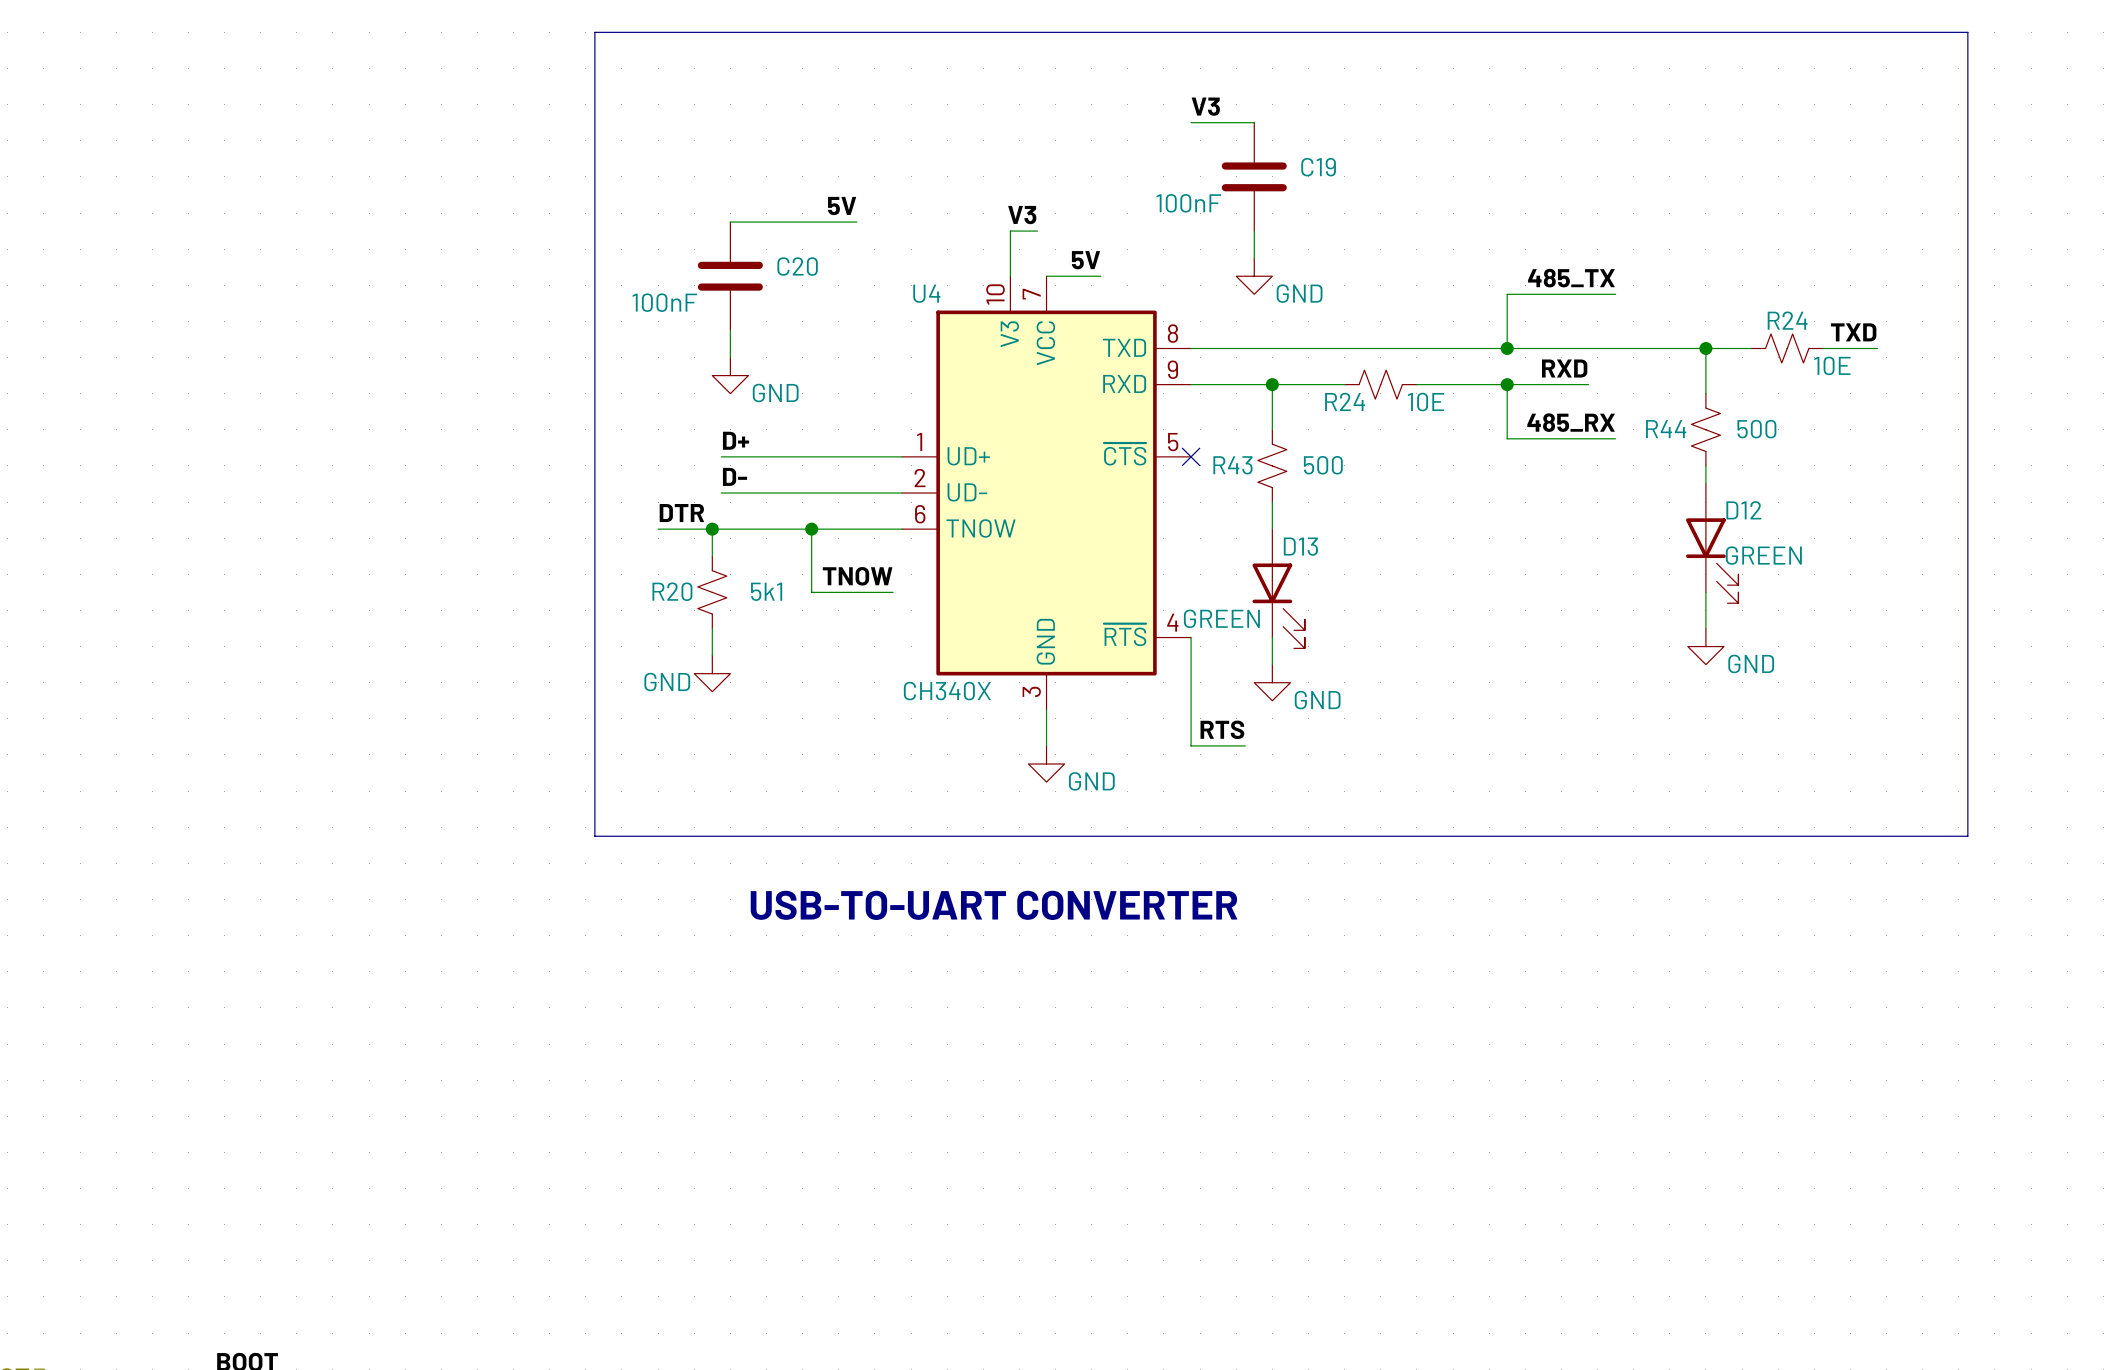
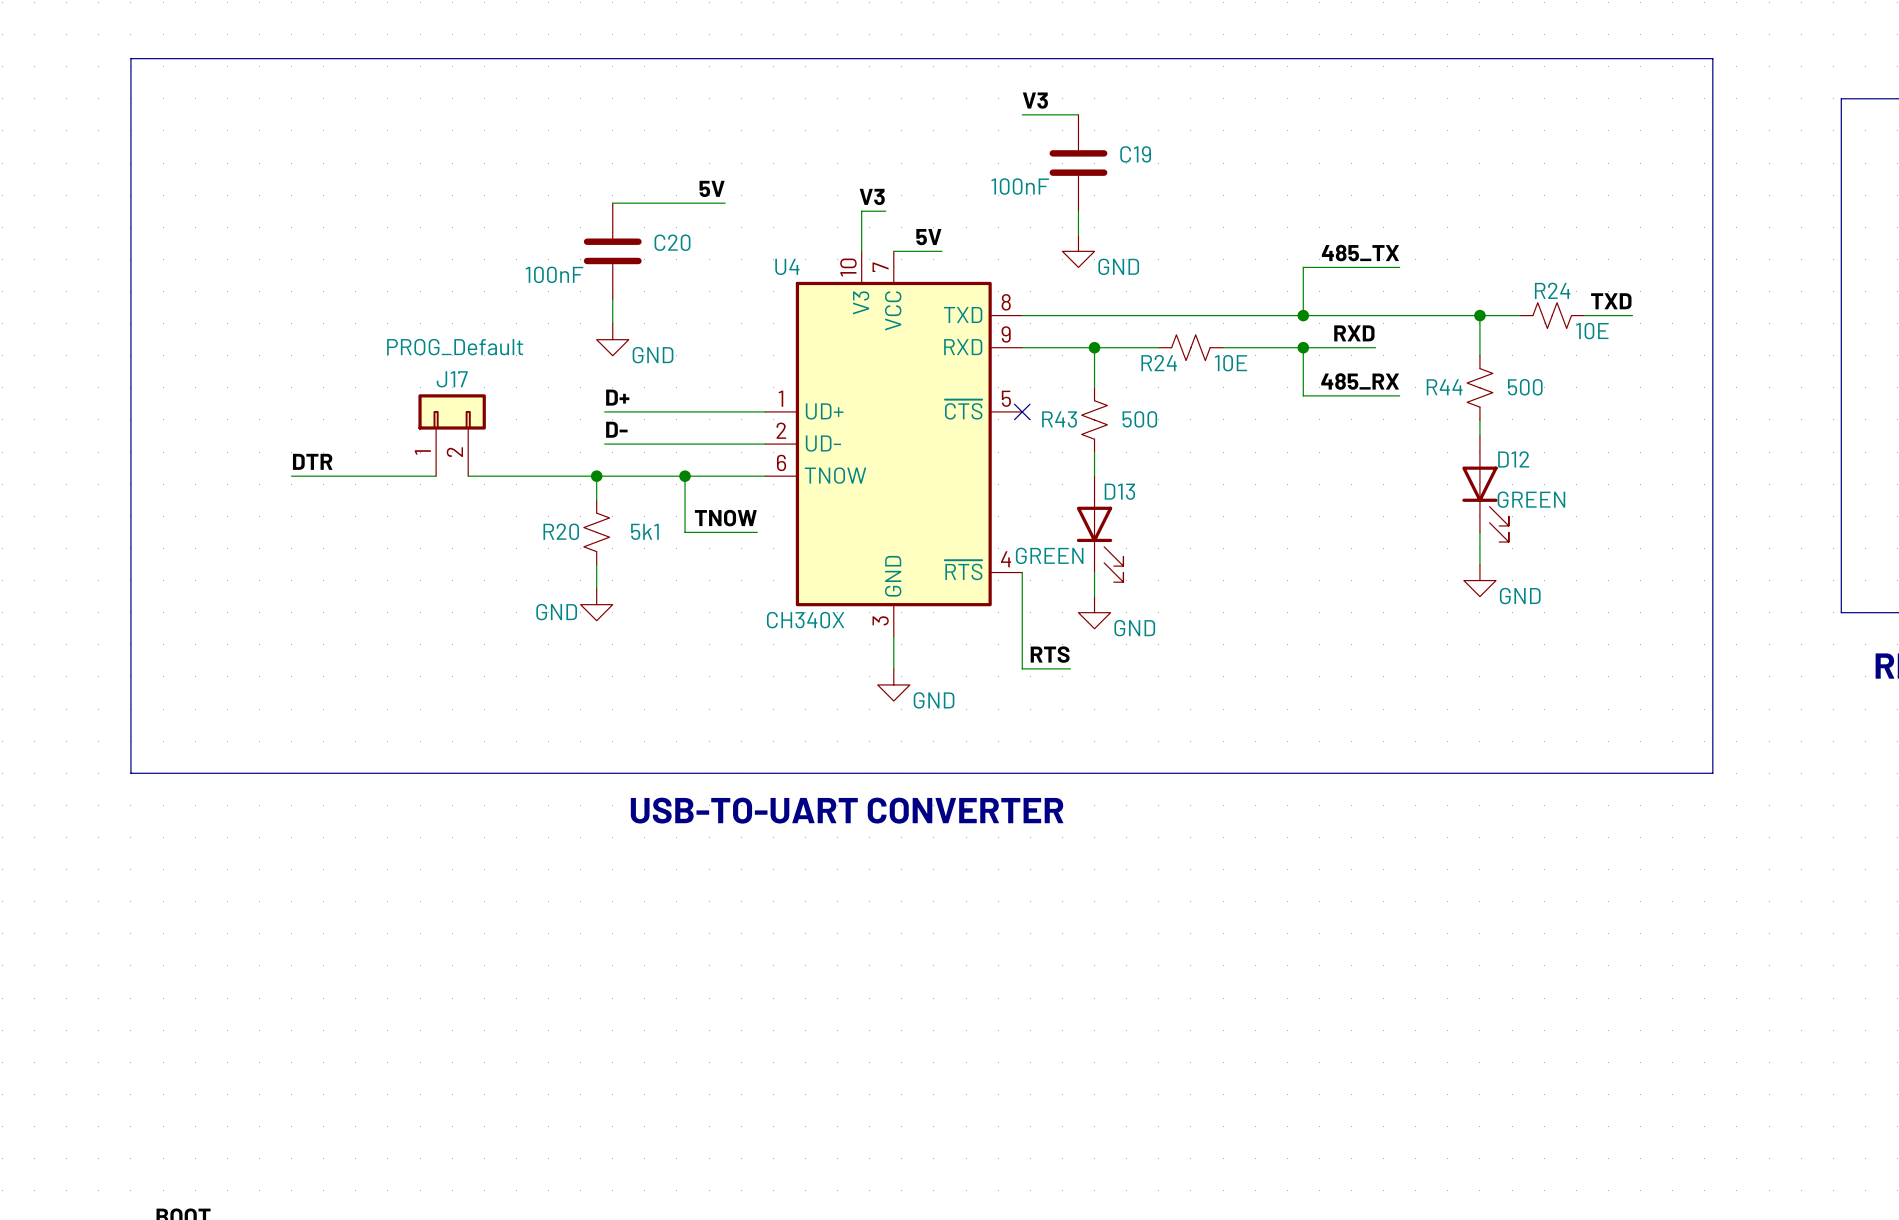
bus: (1967, 59) (1967, 32) (594, 32) (594, 836) (1967, 836) -> (1712, 58) (130, 58) (130, 773) (1712, 773) (1712, 749)
J17: none -> PROG_Default (452, 435)
label position: DTR (681, 513) -> DTR (312, 461)
wire: none -> (291, 476) (436, 476)
wire: none -> (468, 476) (548, 476)

